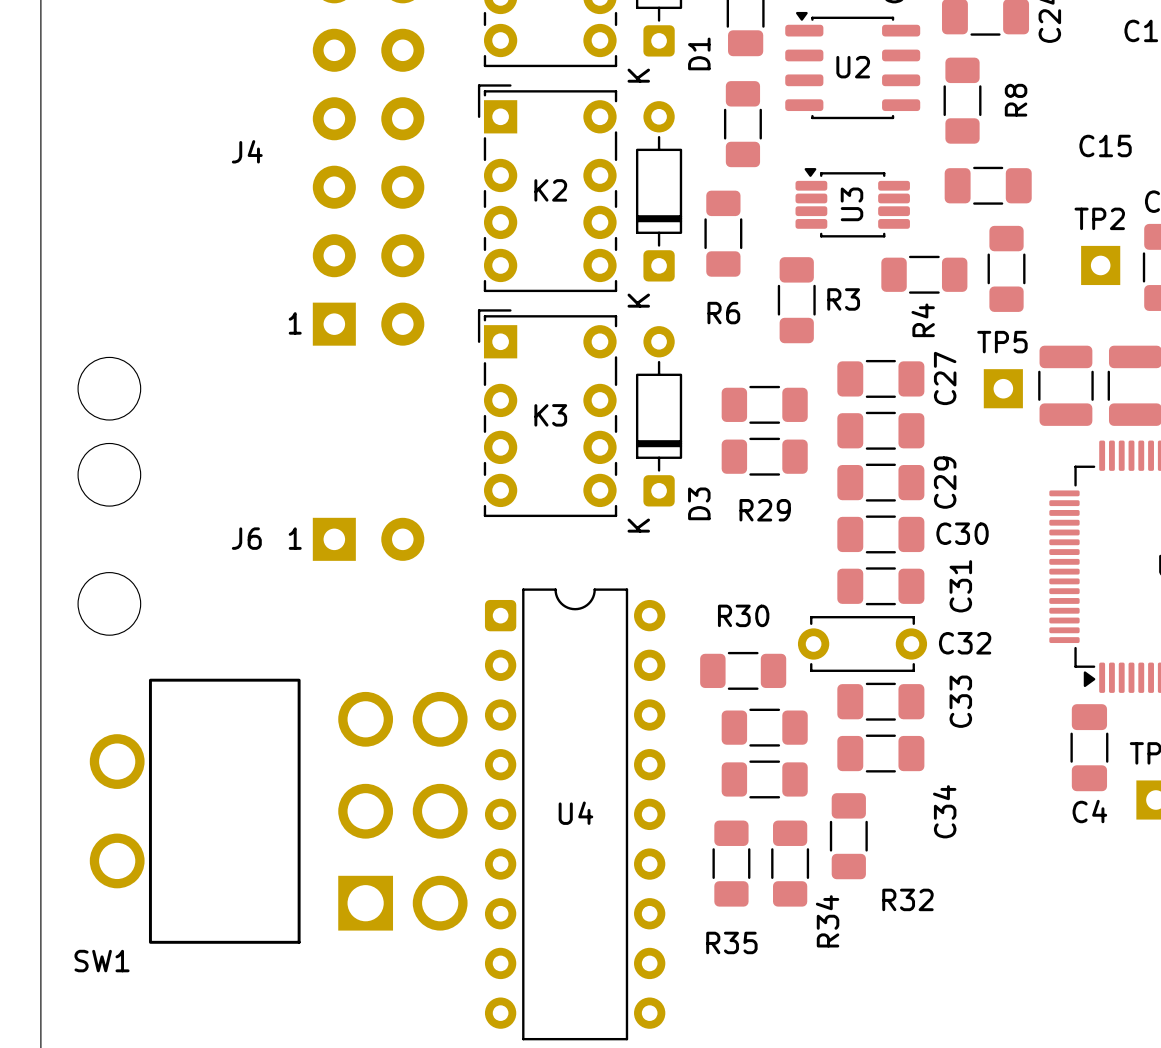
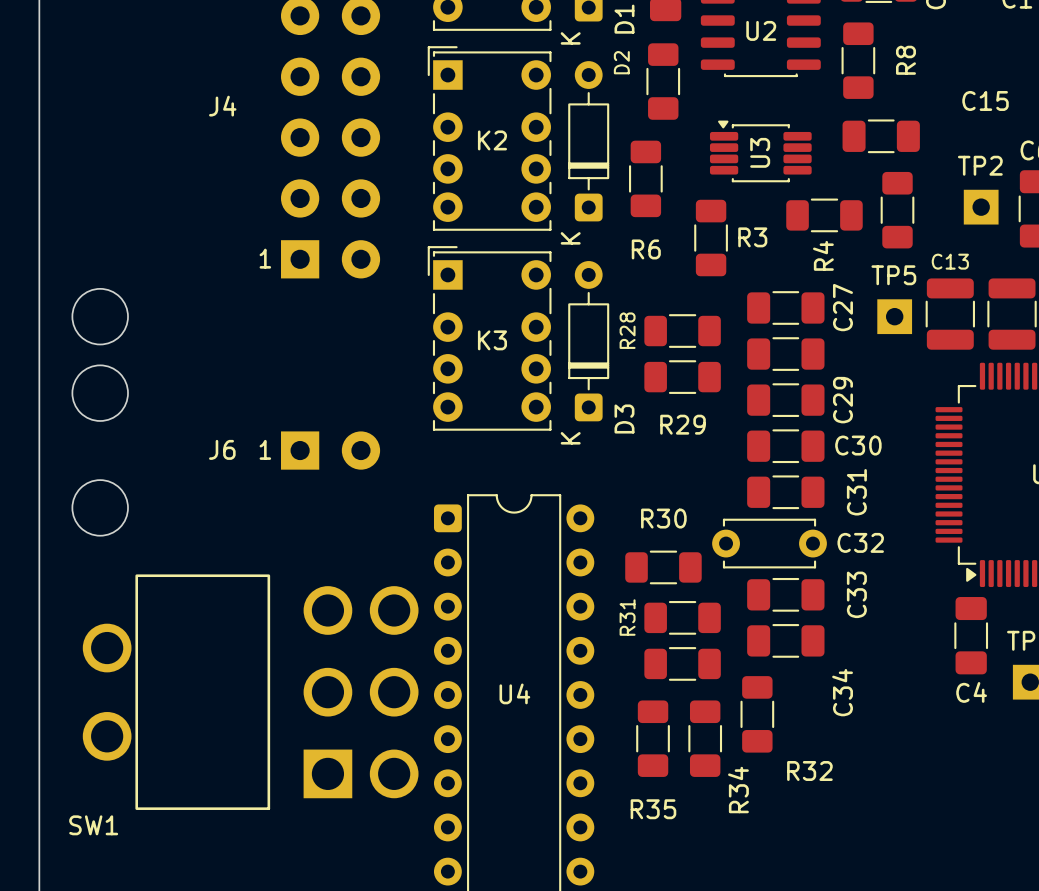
D2 name: none -> D2 (621, 62)
C13 name: none -> C13 (950, 261)
R28 name: none -> R28 (627, 330)
R31 name: none -> R31 (627, 617)

